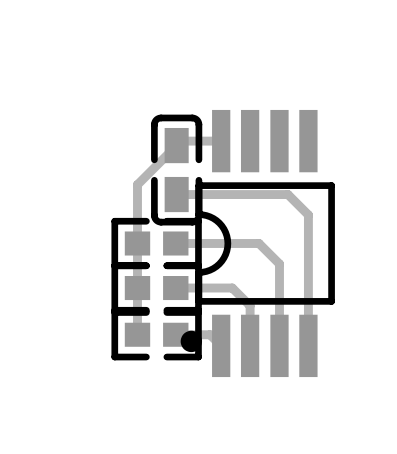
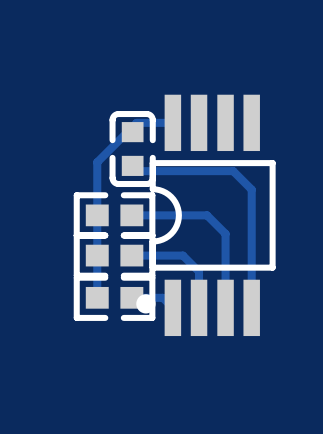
part footprint: [151, 114, 203, 226] -> [109, 111, 156, 188]

